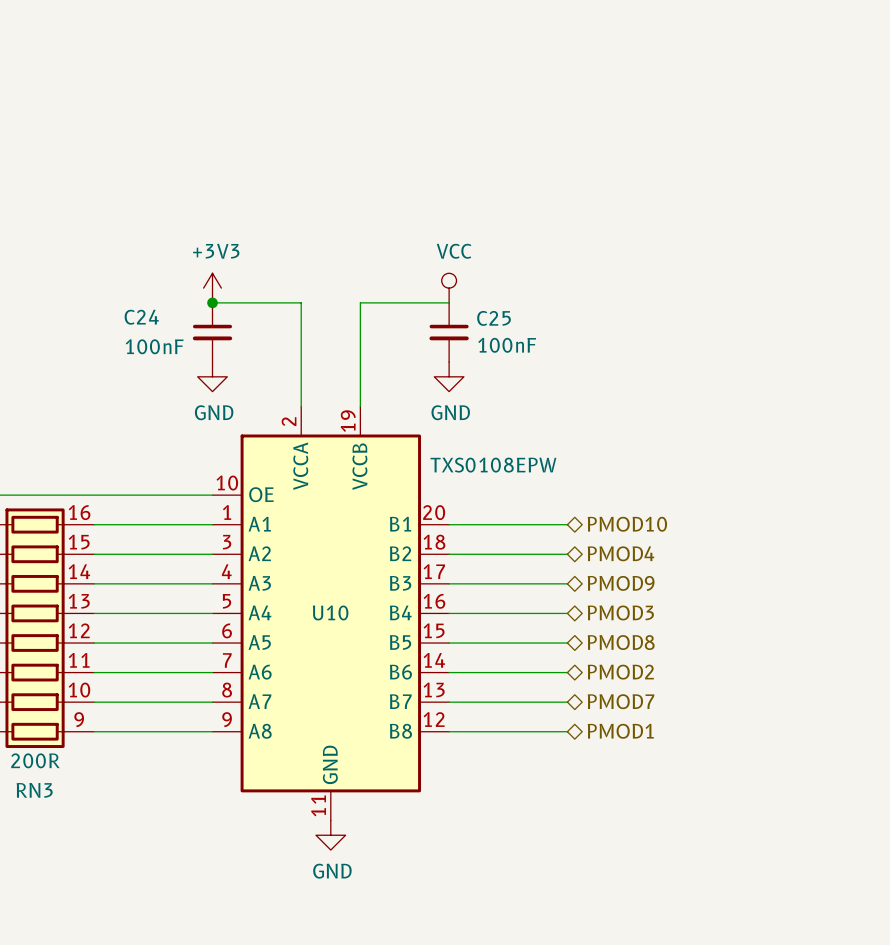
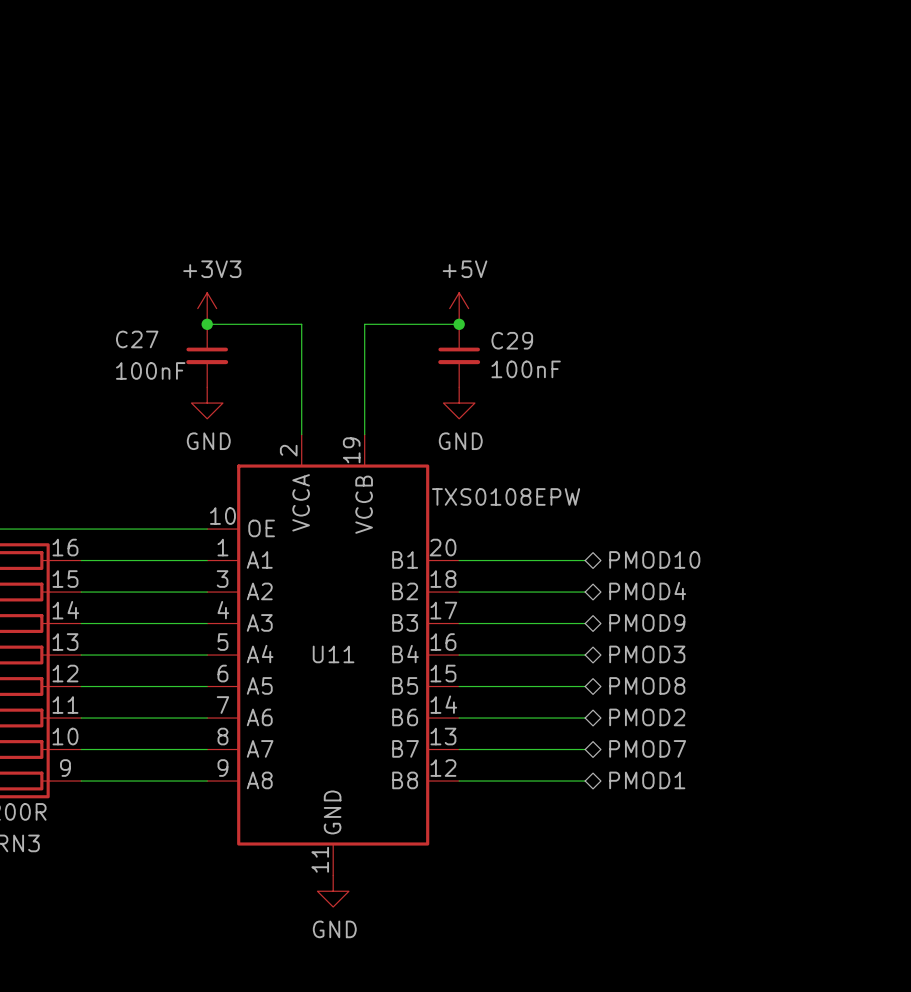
power symbol: VCC (449, 288) -> +5V (459, 308)
junction: none -> (459, 324)
C24 name: C24 (141, 317) -> C27 (137, 339)
C25 name: C25 (494, 318) -> C29 (512, 340)
U10 name: U10 (330, 612) -> U11 (333, 654)

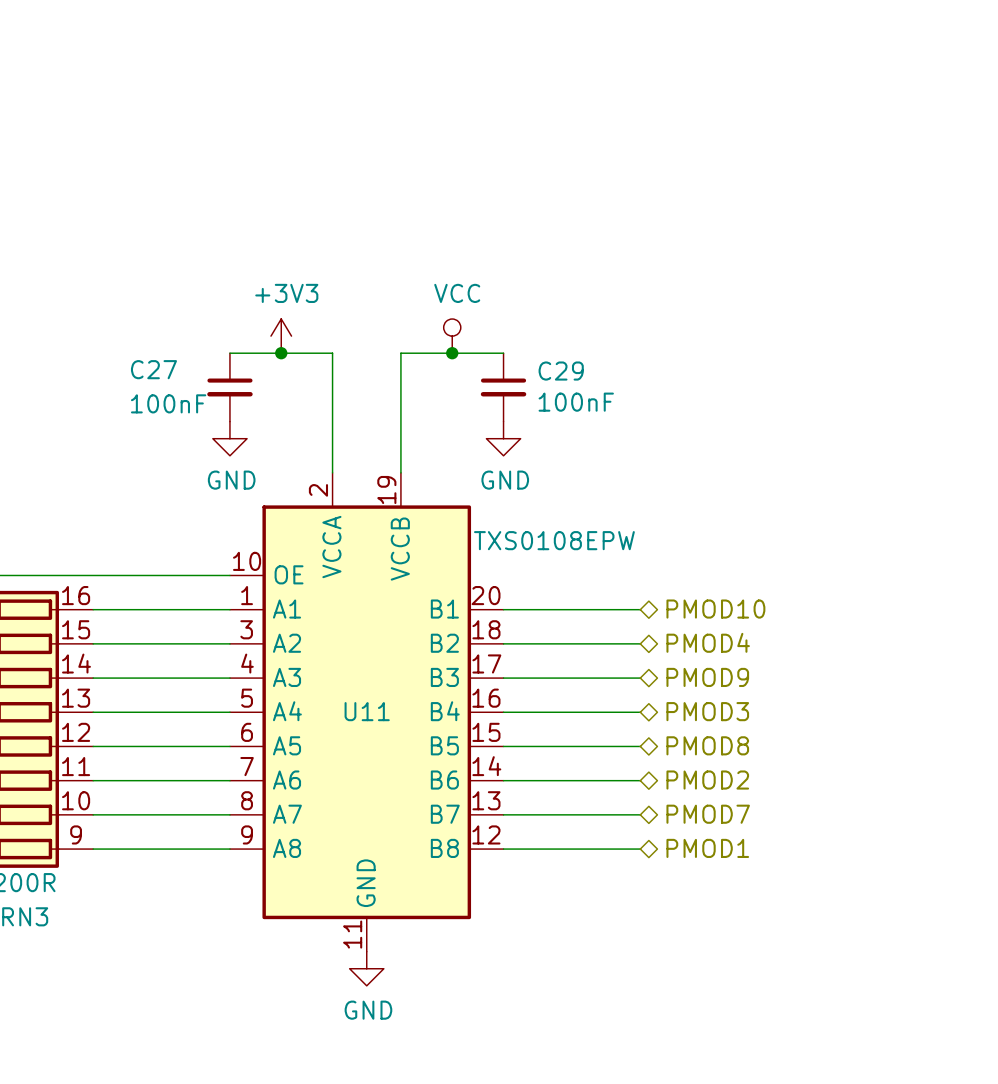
power symbol position: +3V3 (207, 308) -> +3V3 (281, 336)
power symbol: none -> VCC (452, 336)
power symbol: +5V (459, 308) -> none
junction position: (207, 324) -> (281, 353)
junction position: (459, 324) -> (452, 353)

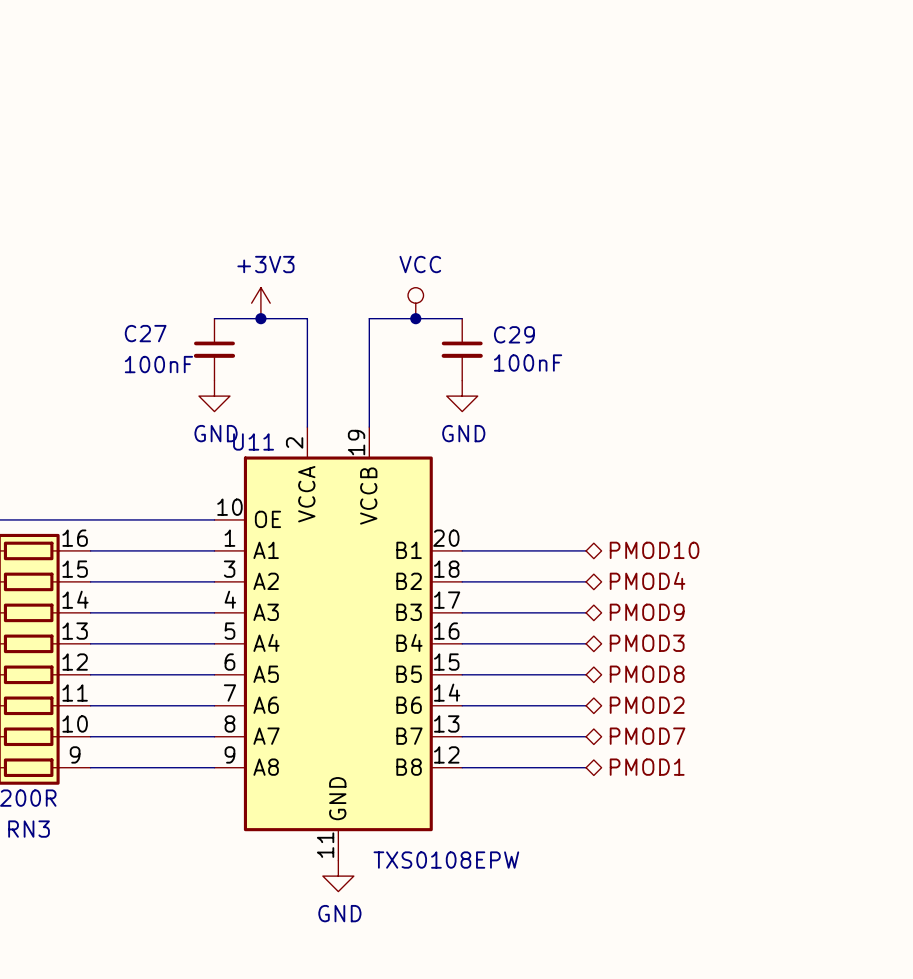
U11 value position: TXS0108EPW (554, 540) -> TXS0108EPW (446, 860)
U11 name position: U11 (367, 711) -> U11 (253, 441)

